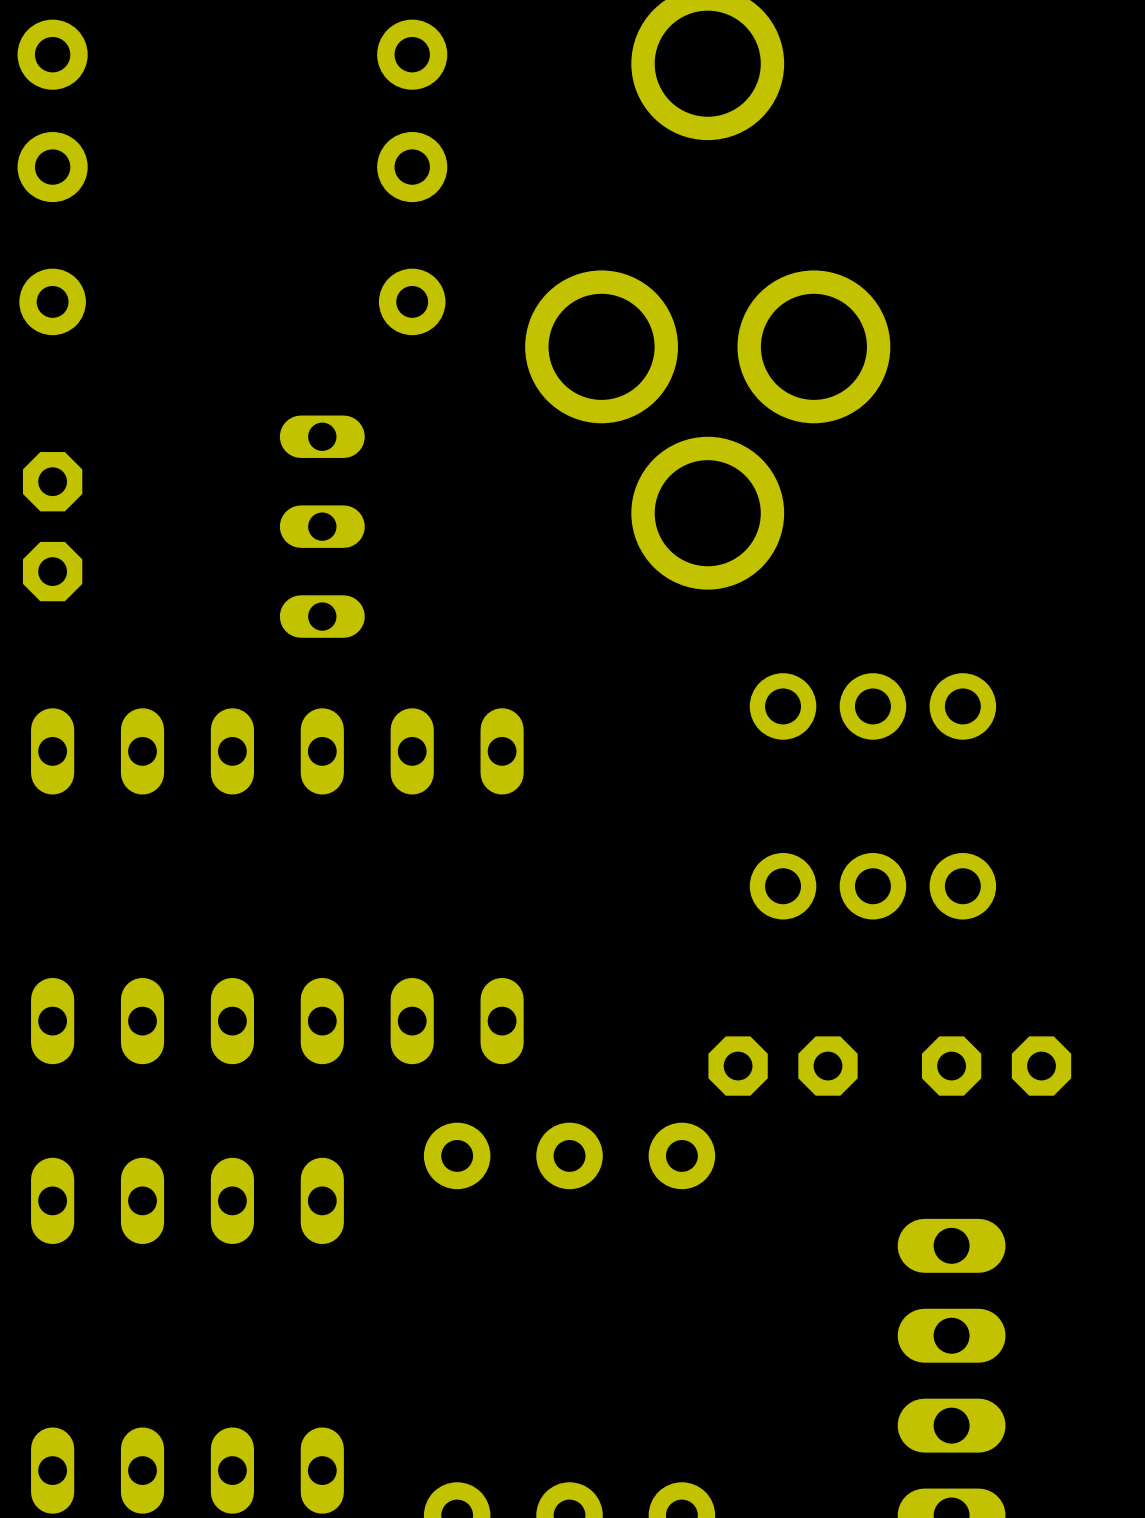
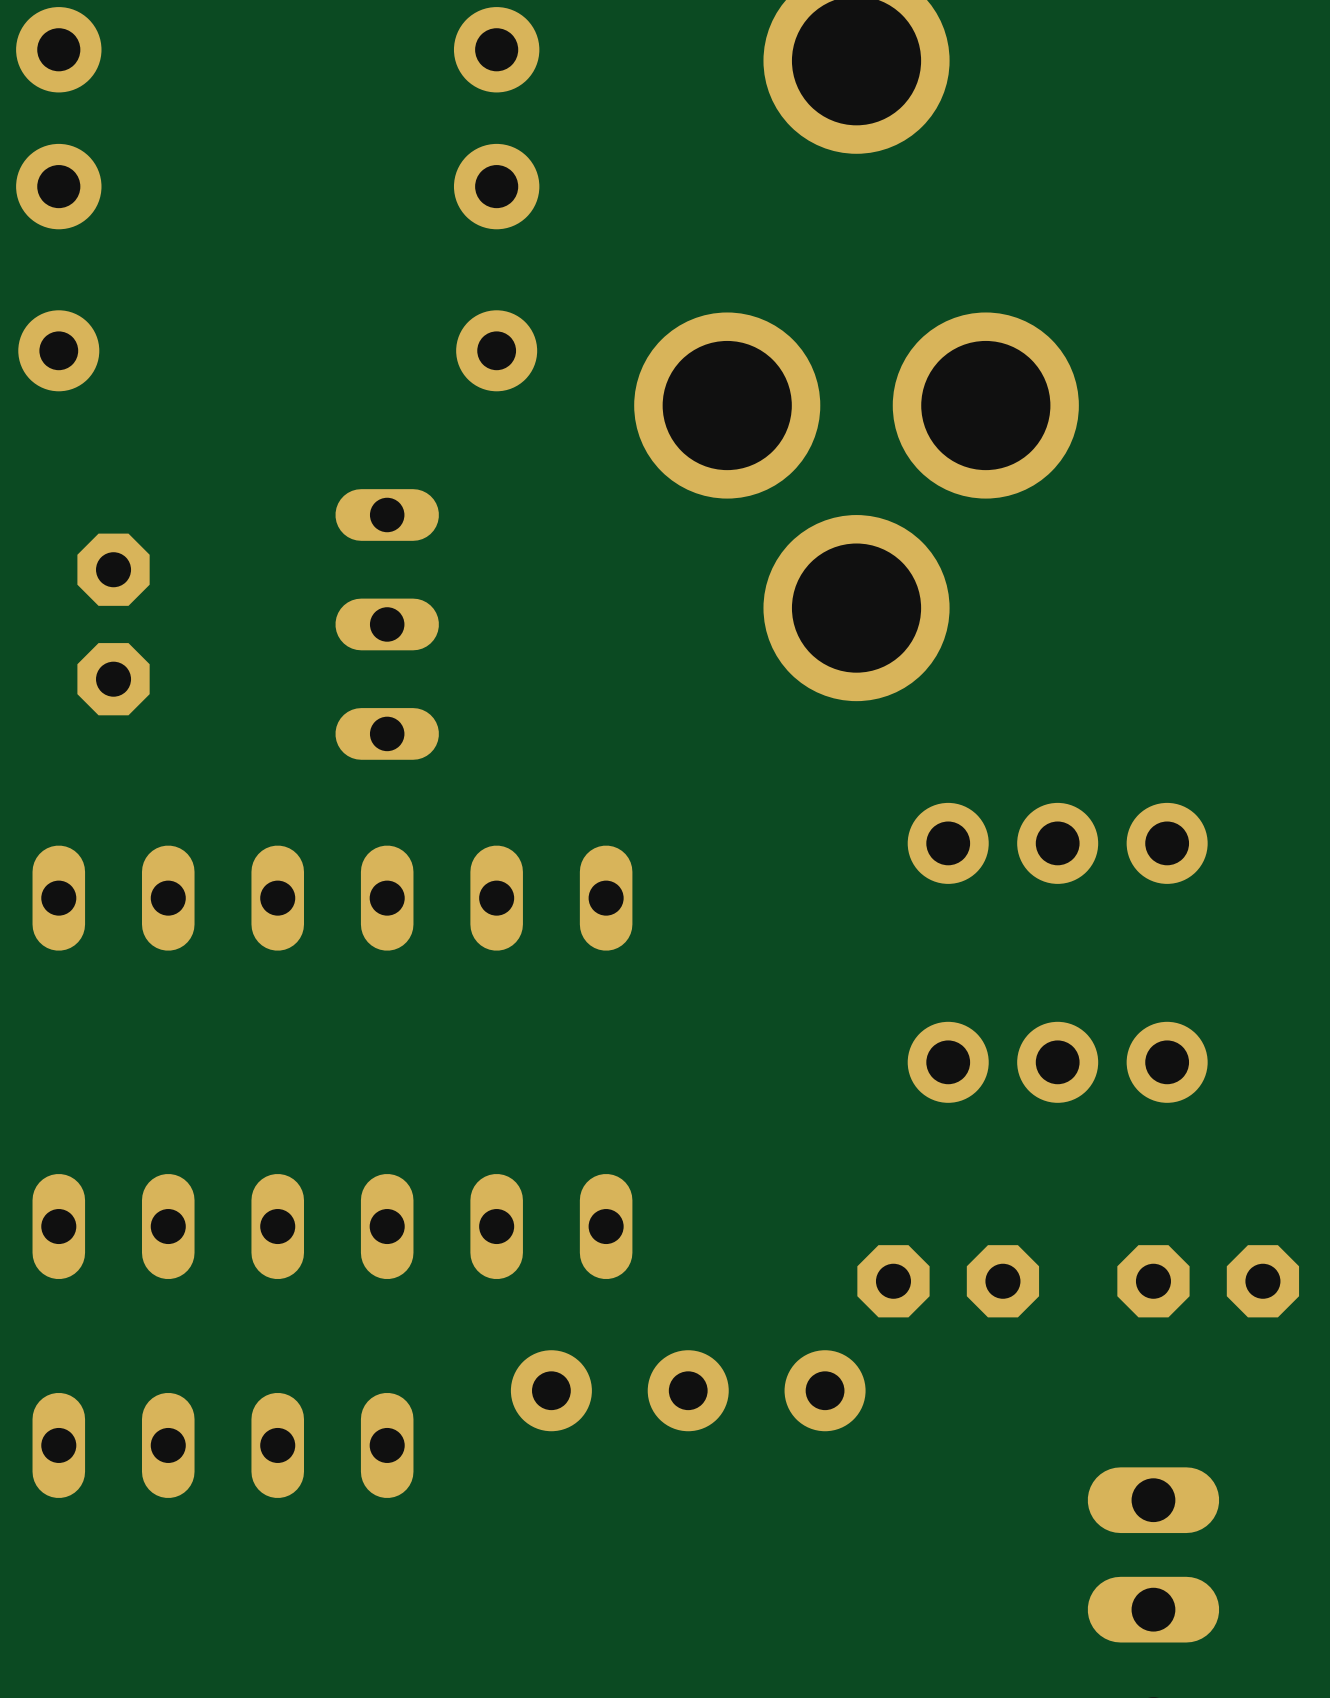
part position: (52, 526) -> (113, 624)

